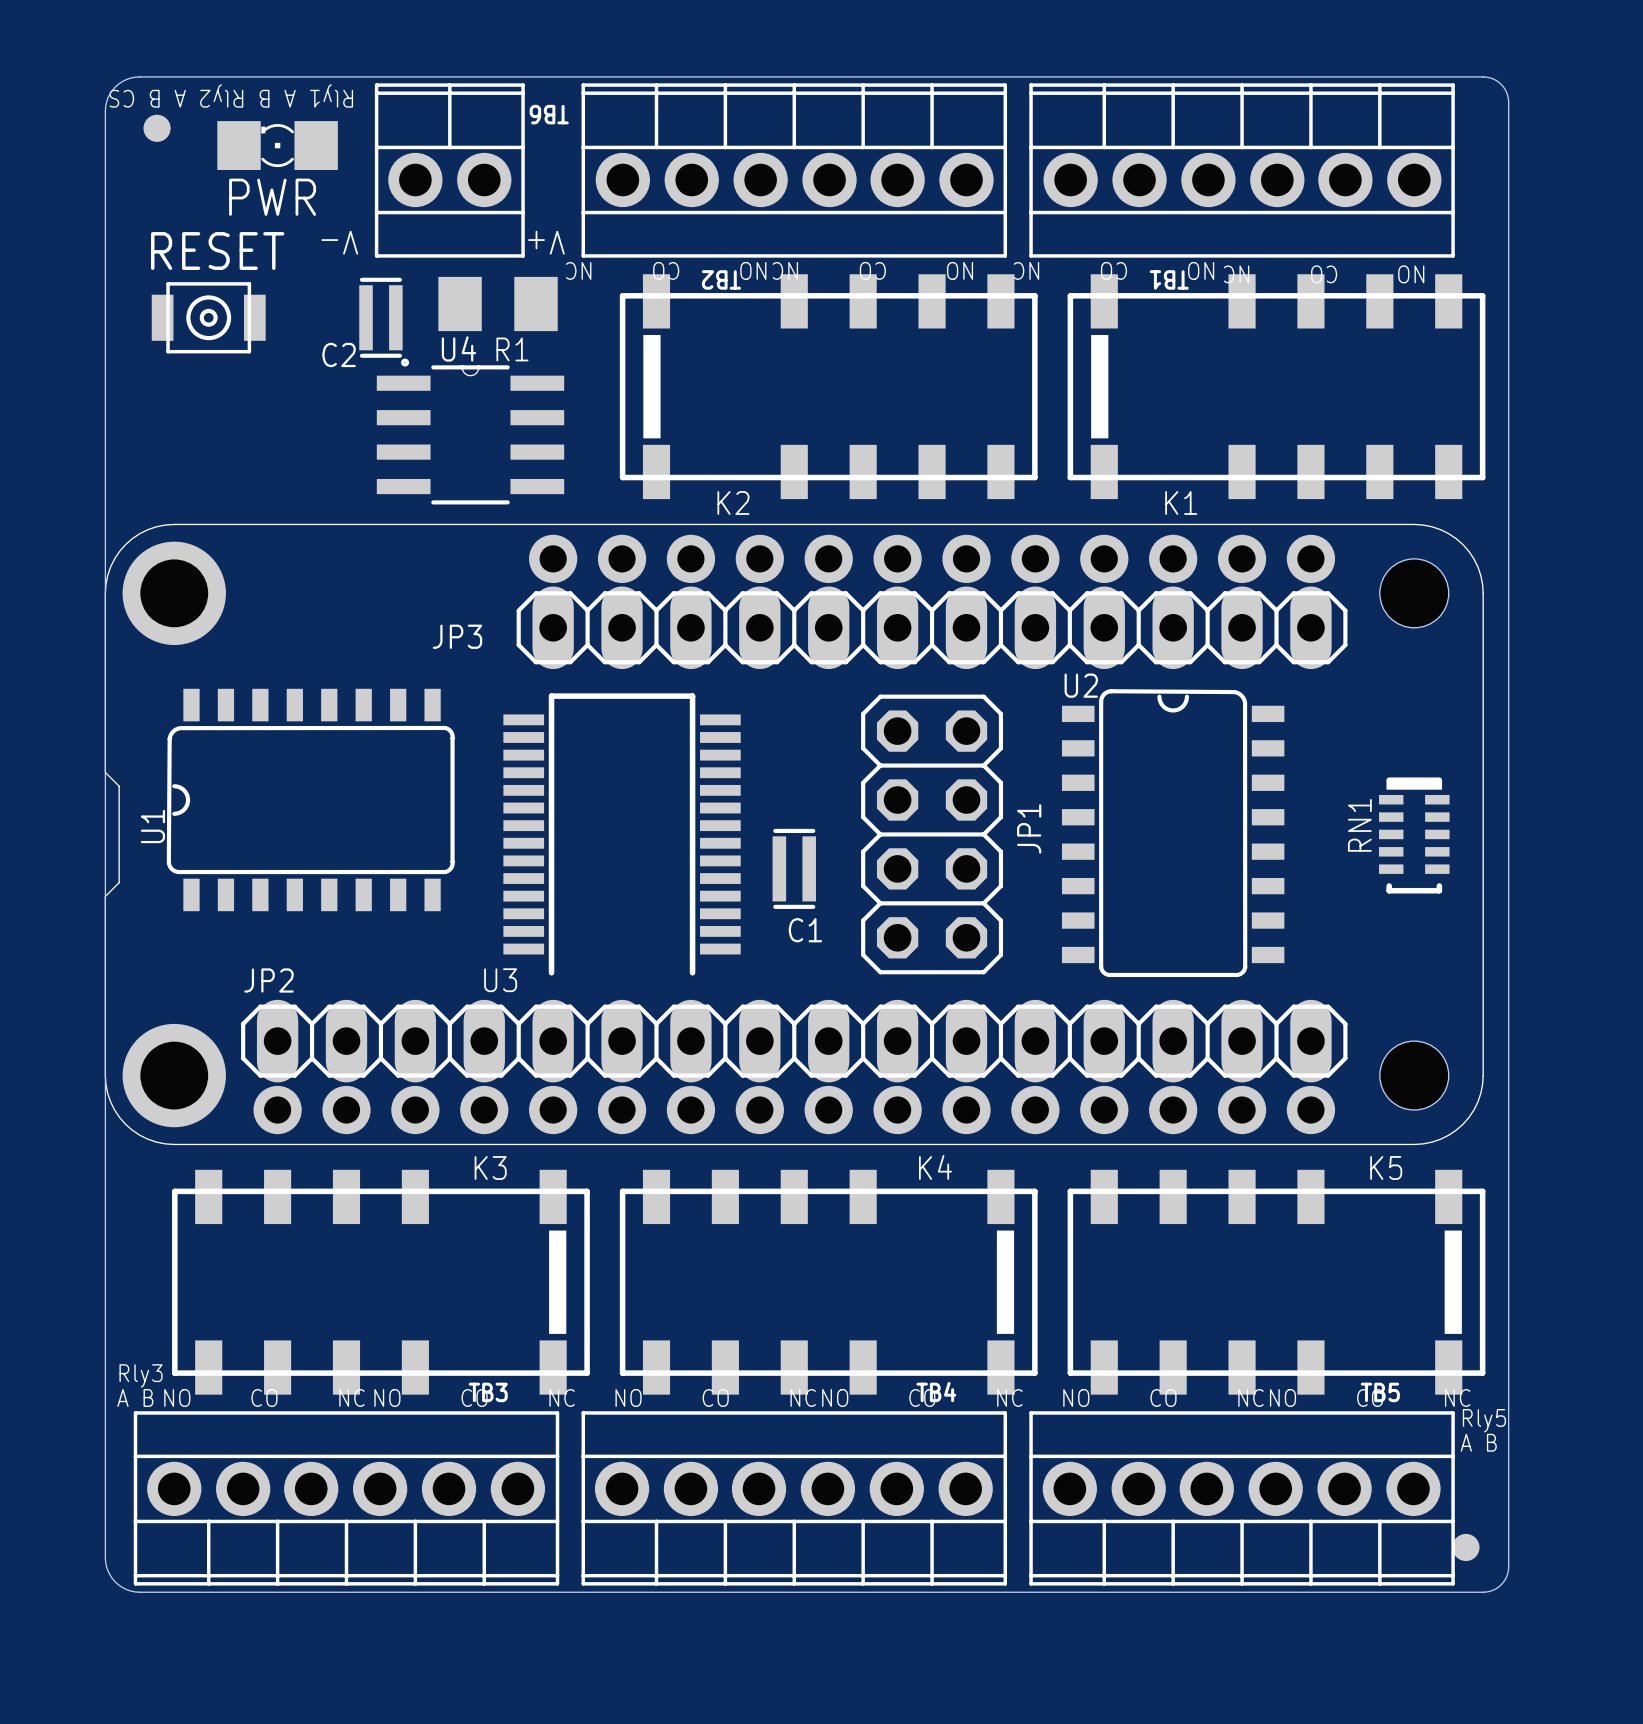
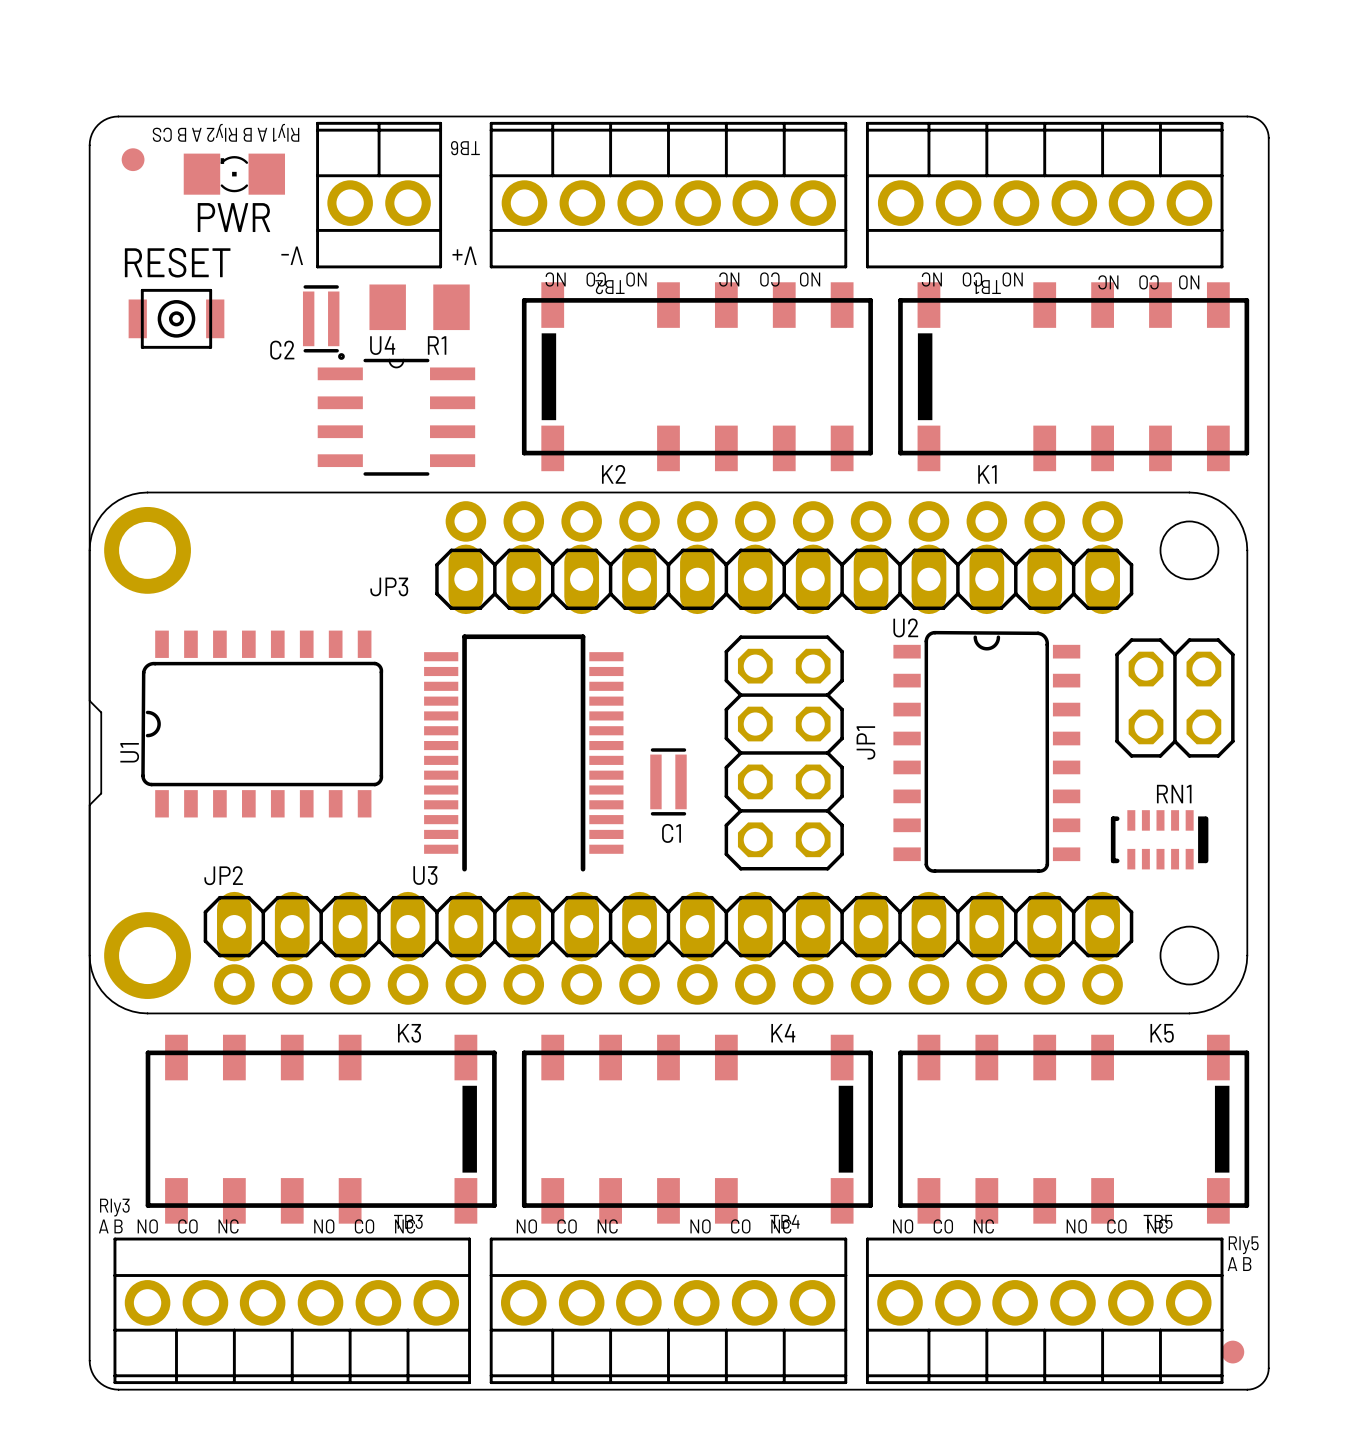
part: none -> (1174, 697)
RN1 rotation: 0° (1414, 835) -> 90° clockwise (1159, 839)
RN1 position: (1414, 835) -> (1159, 839)

